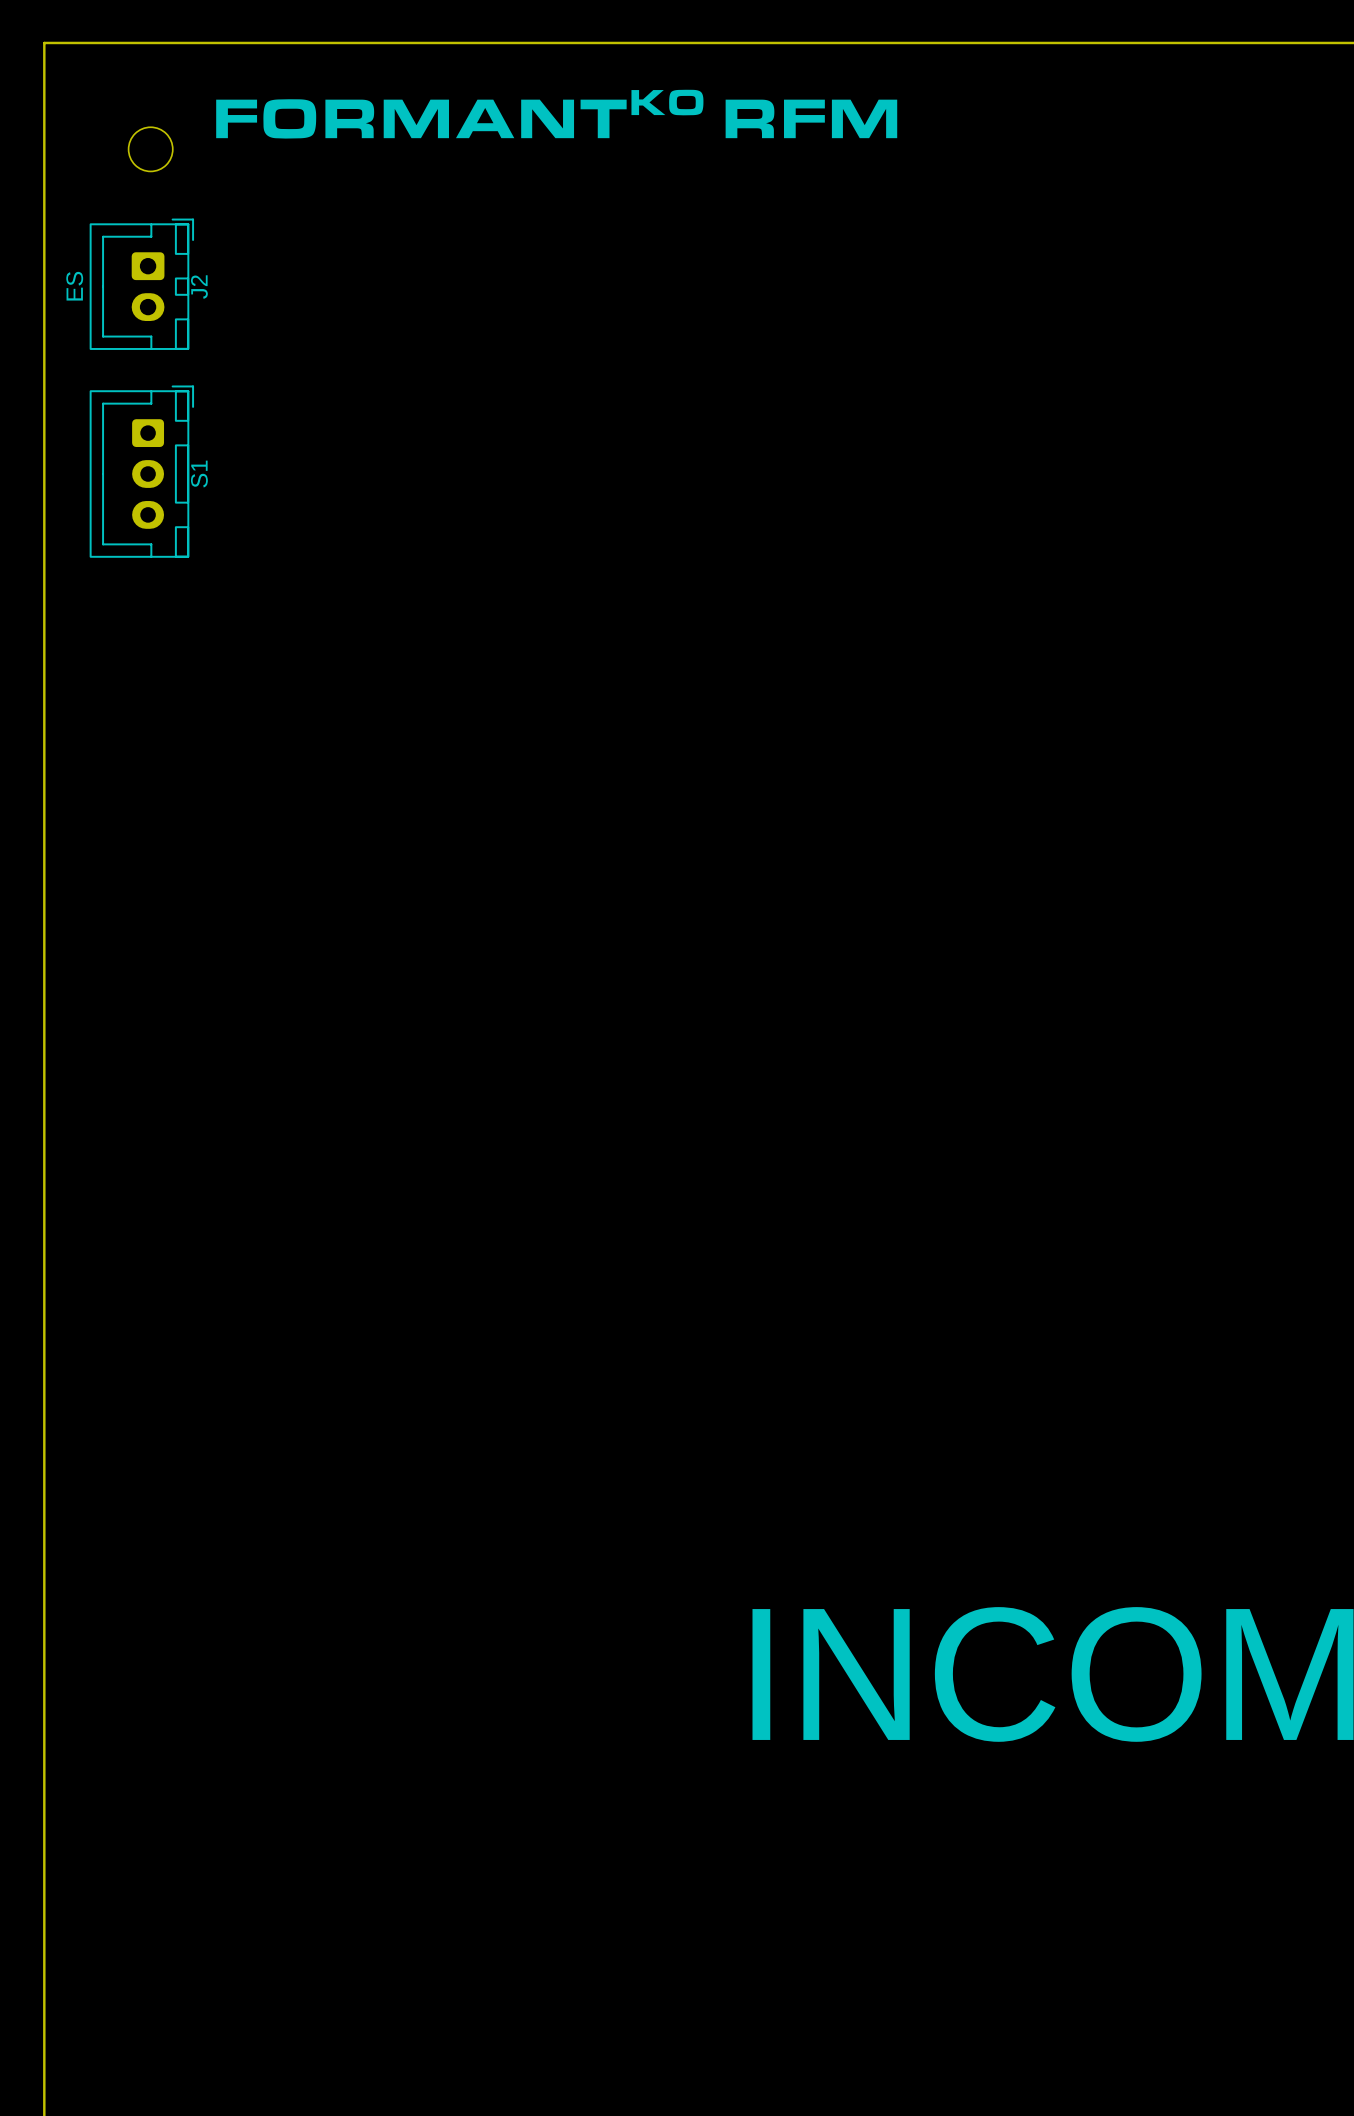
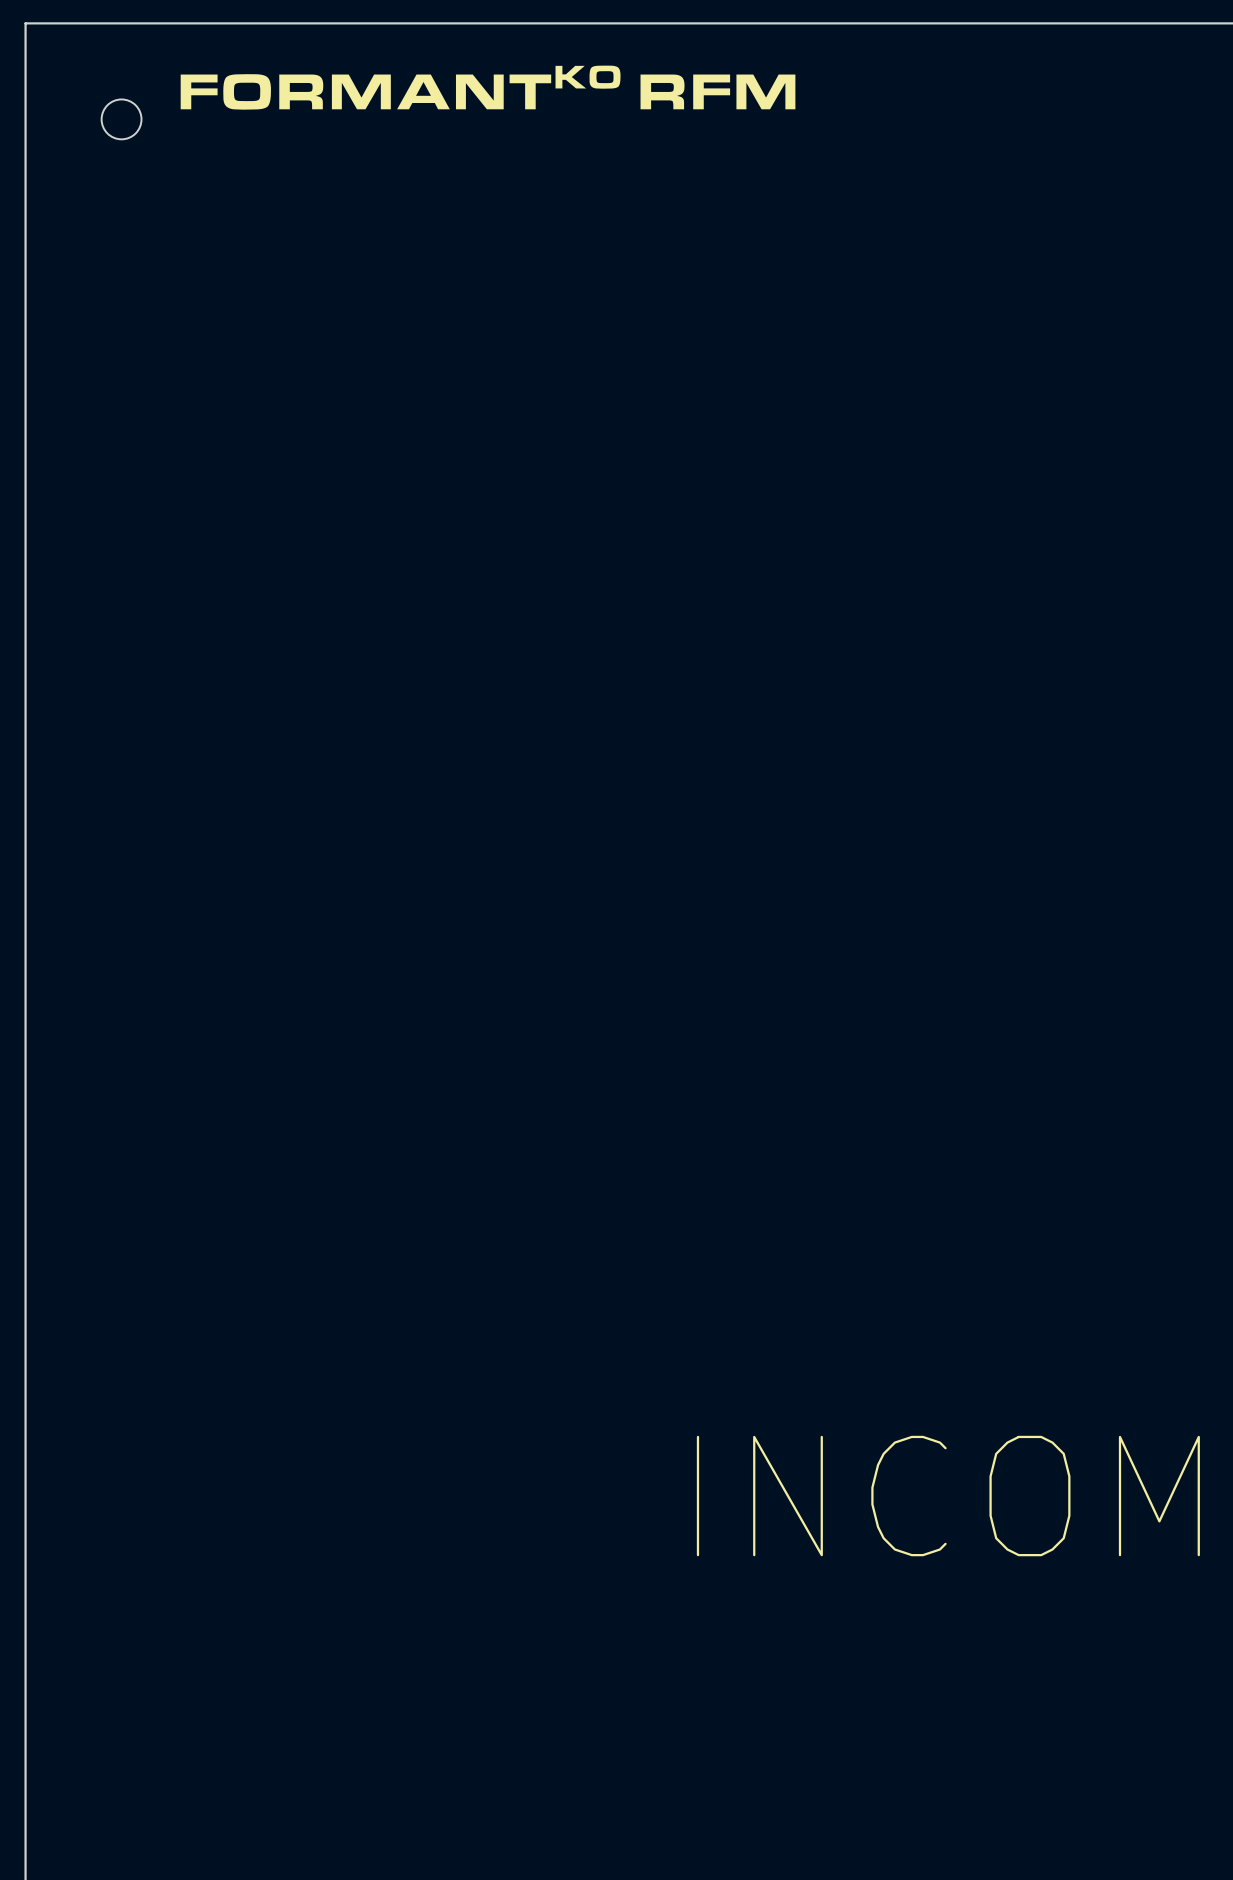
J2: ES (141, 284) -> none
S1: (141, 471) -> none

